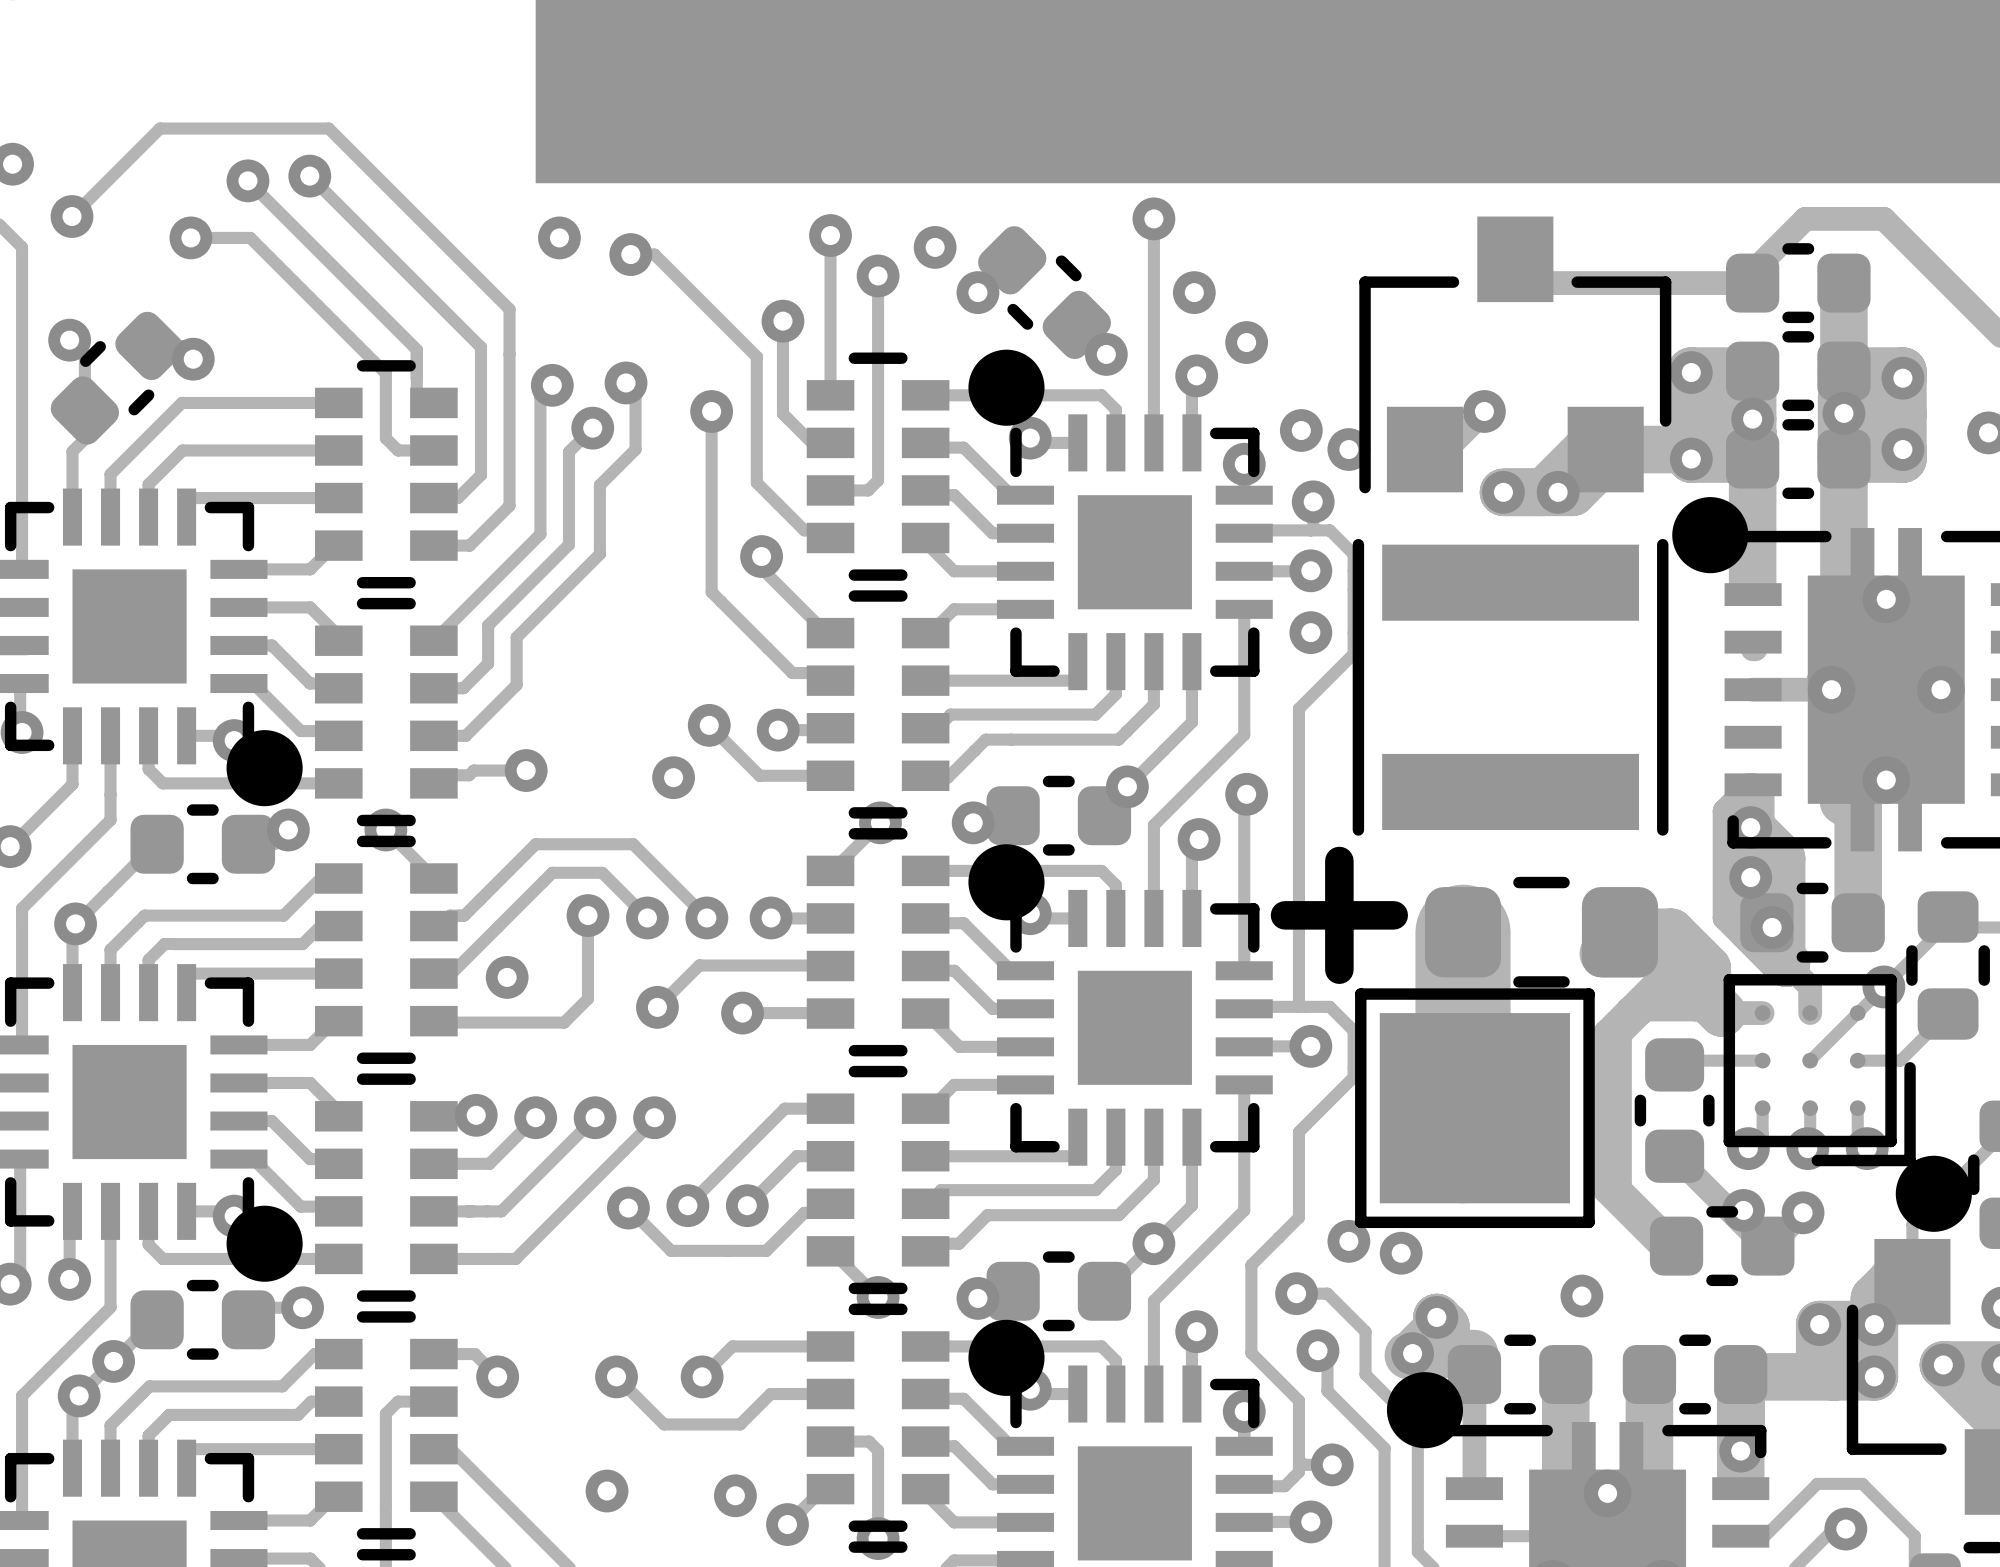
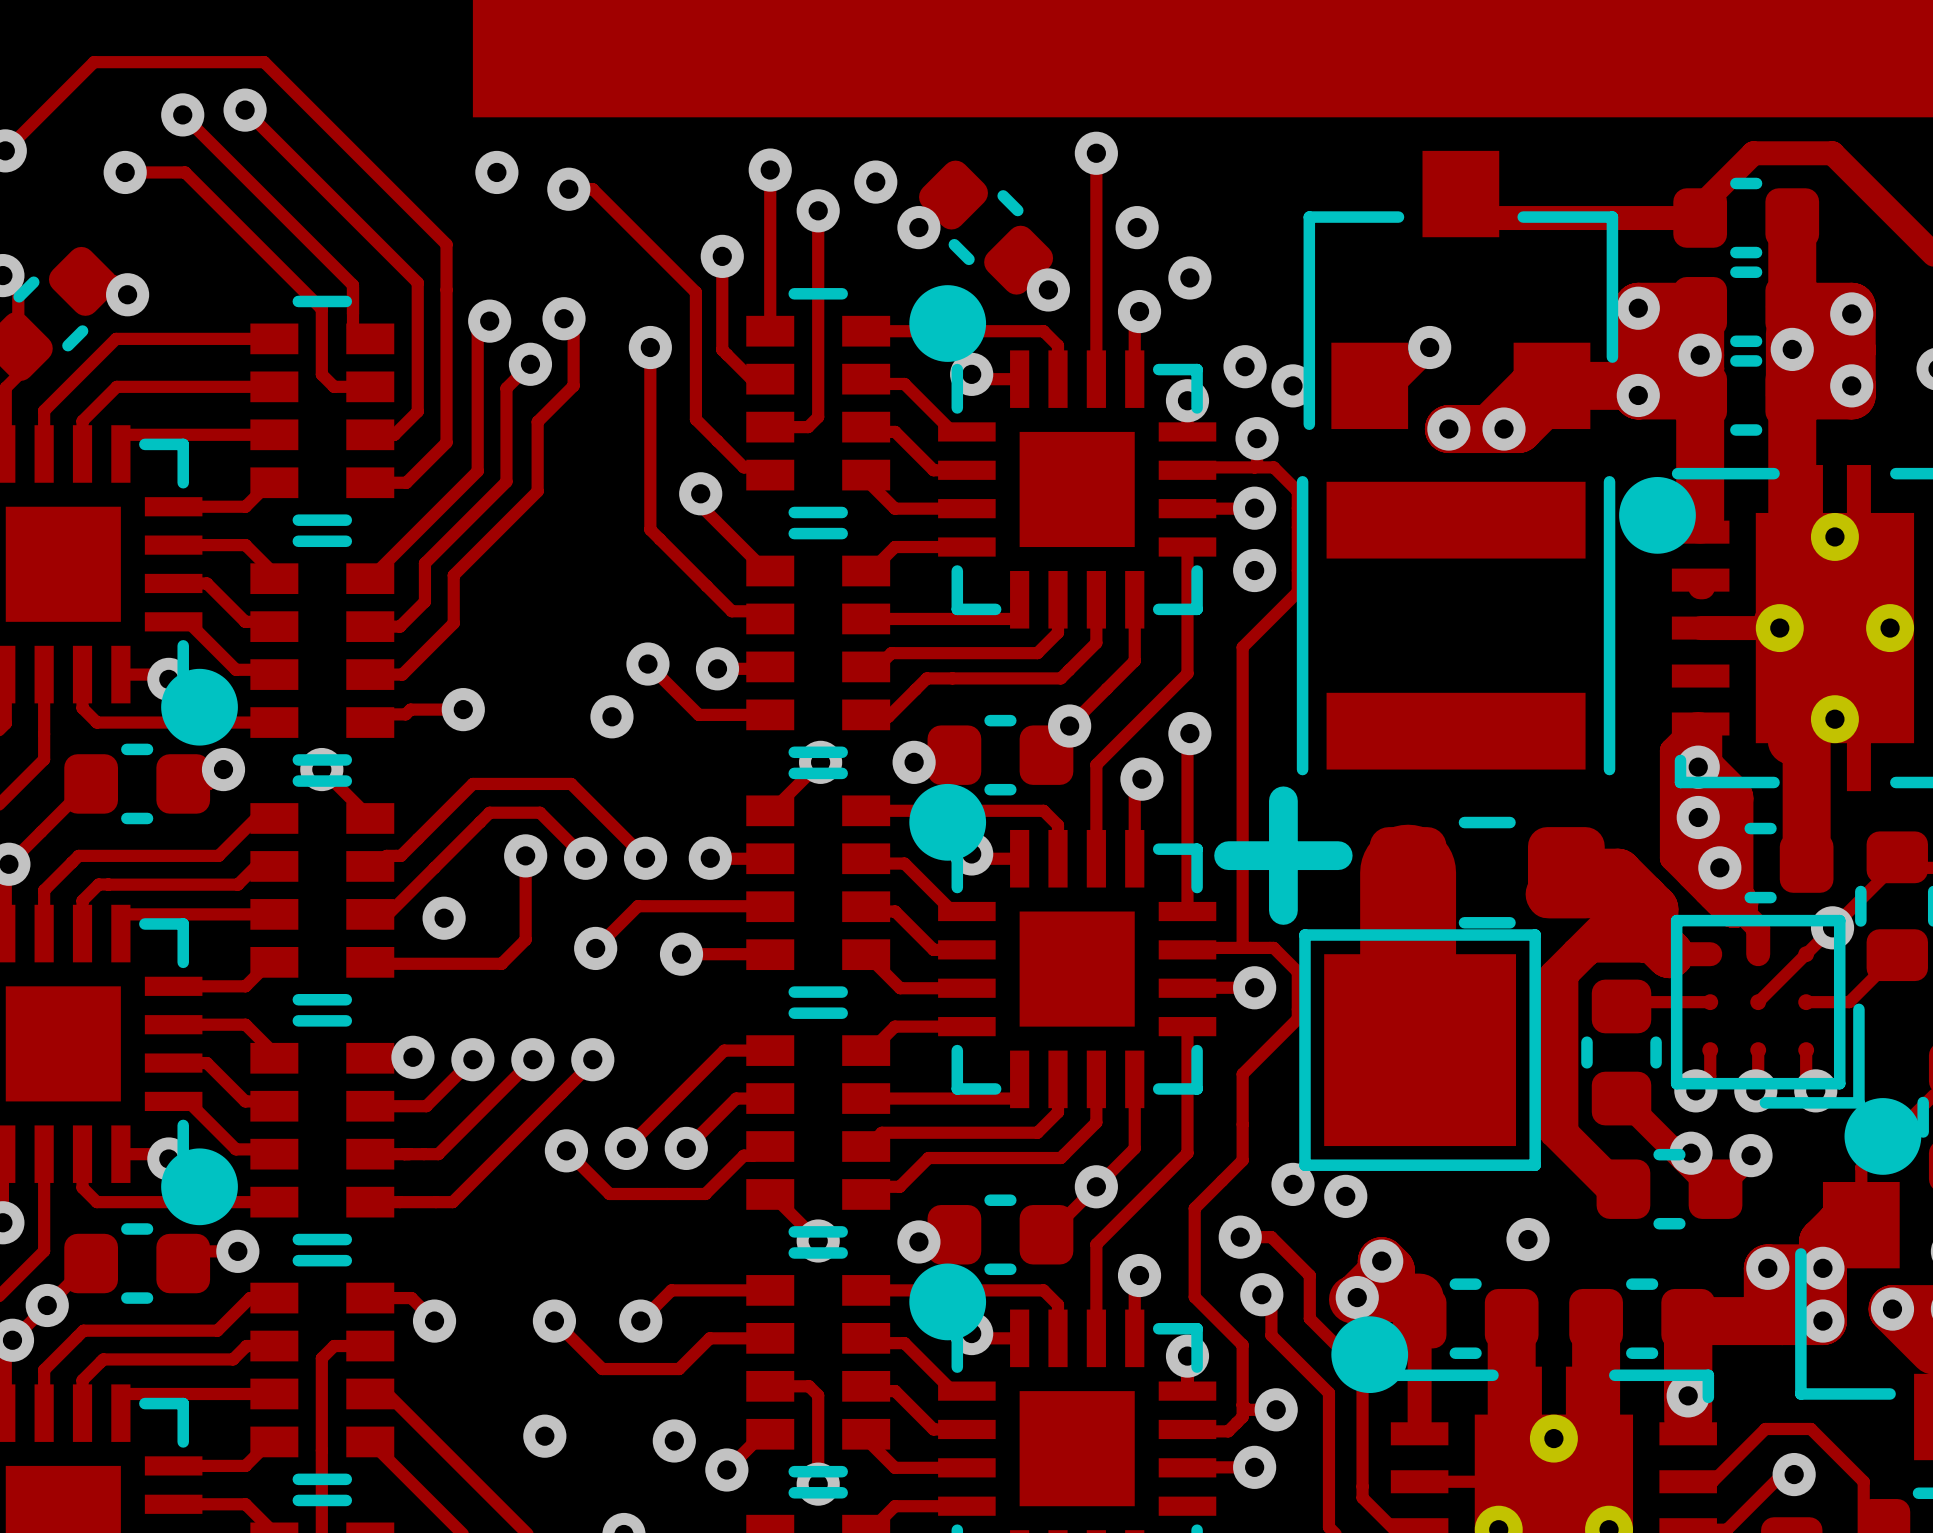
drawing position: (1710, 535) -> (1657, 515)

